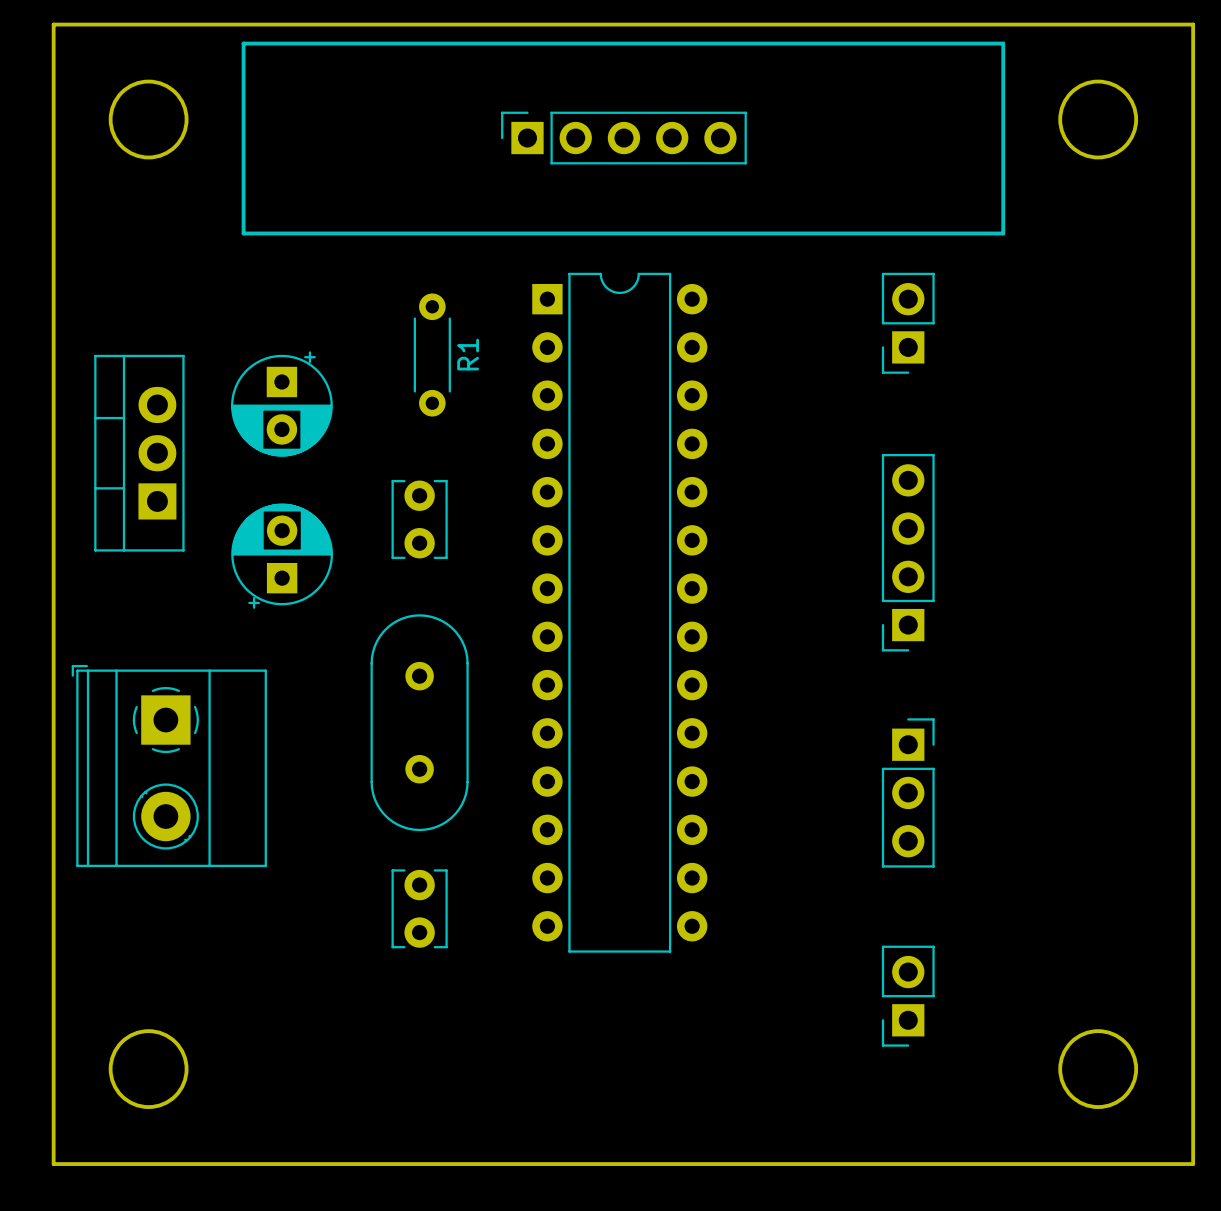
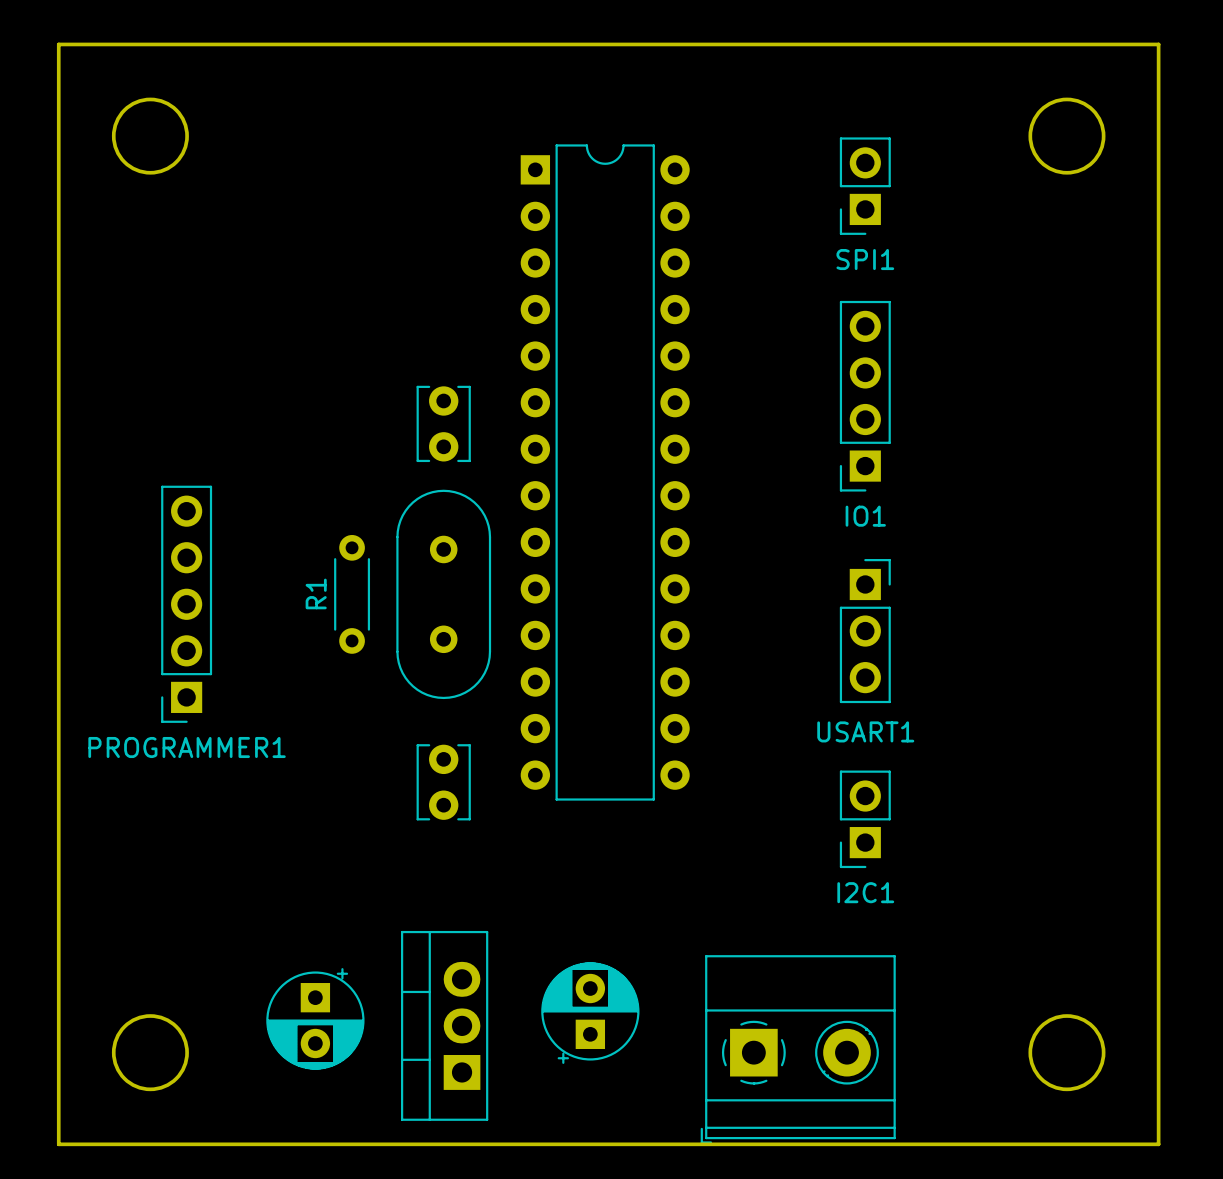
line: (243, 43) (1003, 43) (1003, 233) (243, 233) (243, 43) -> none
part: (623, 138) -> none
SPI1: none -> (865, 186)
part: (908, 323) -> none
R1 name position: R1 (468, 354) -> R1 (316, 593)
R1 position: (432, 355) -> (352, 594)
IO1: none -> (865, 396)
part: (281, 403) -> none
part: (139, 453) -> none
part position: (419, 519) -> (443, 423)
part: (908, 552) -> none
part: (282, 556) -> none
PROGRAMMER1: none -> (186, 604)
part position: (619, 612) -> (605, 472)
USART1: none -> (865, 631)
part position: (419, 722) -> (443, 594)
part: (169, 765) -> none
part: (908, 792) -> none
I2C1: none -> (865, 819)
part position: (419, 908) -> (443, 782)
part: (908, 996) -> none
part: none -> (590, 1013)
part: none -> (315, 1018)
part: none -> (444, 1025)
part: none -> (798, 1049)

